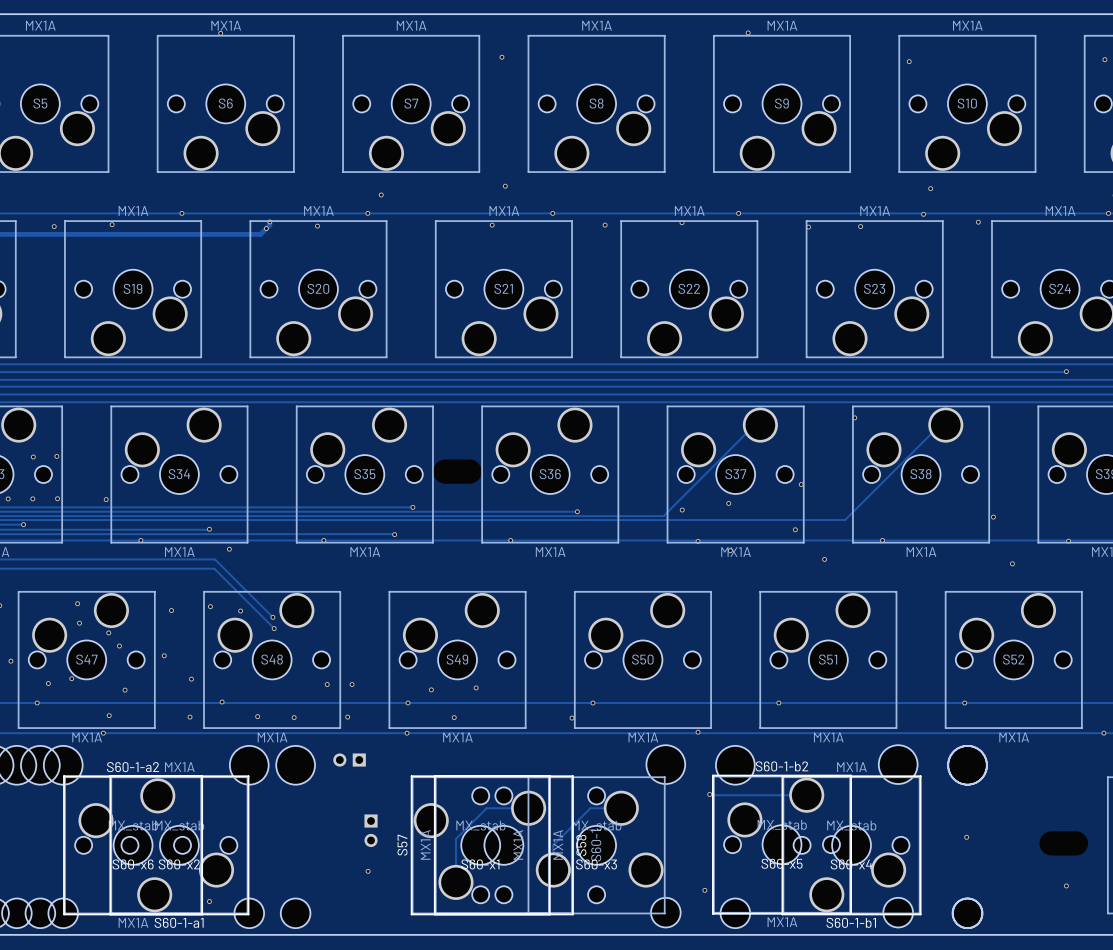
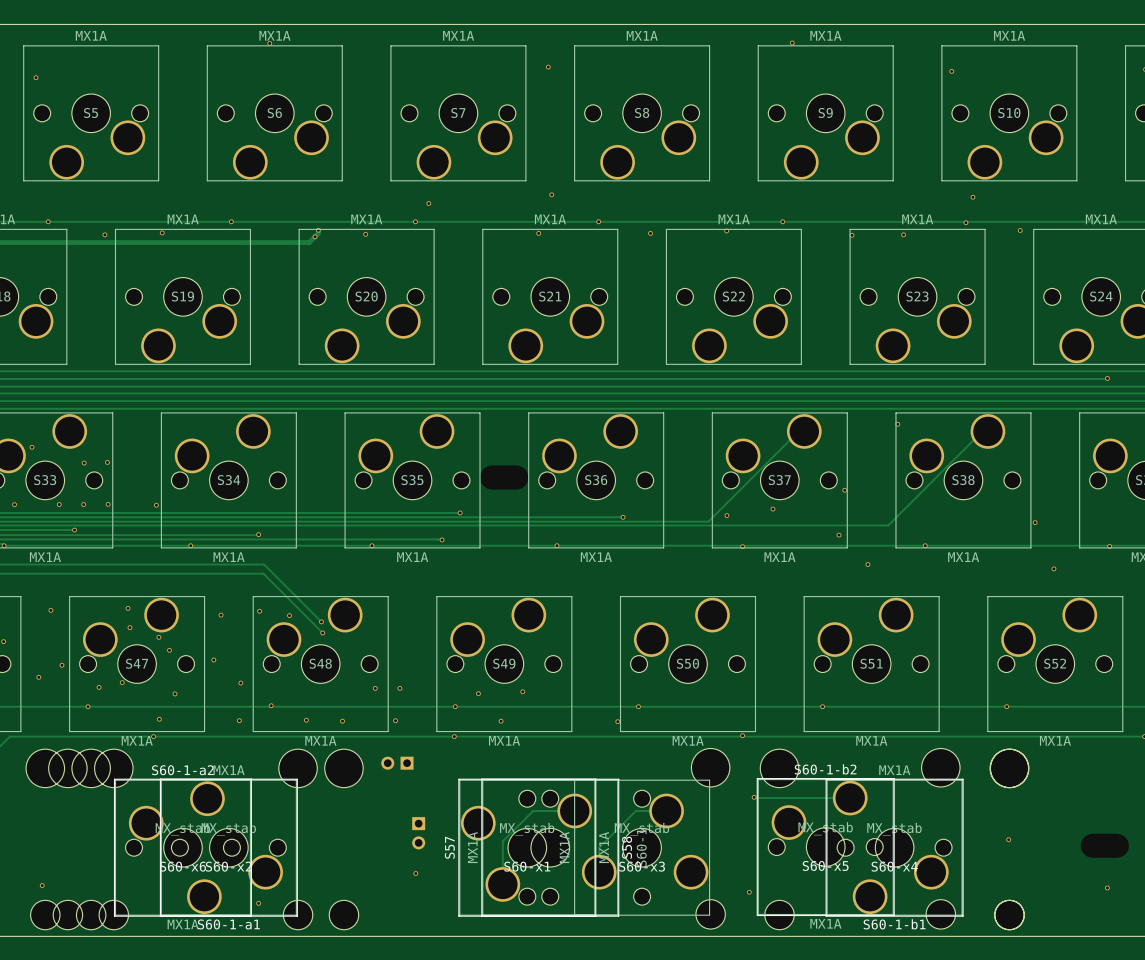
via: (229, 549) -> none
via: (730, 550) -> none

